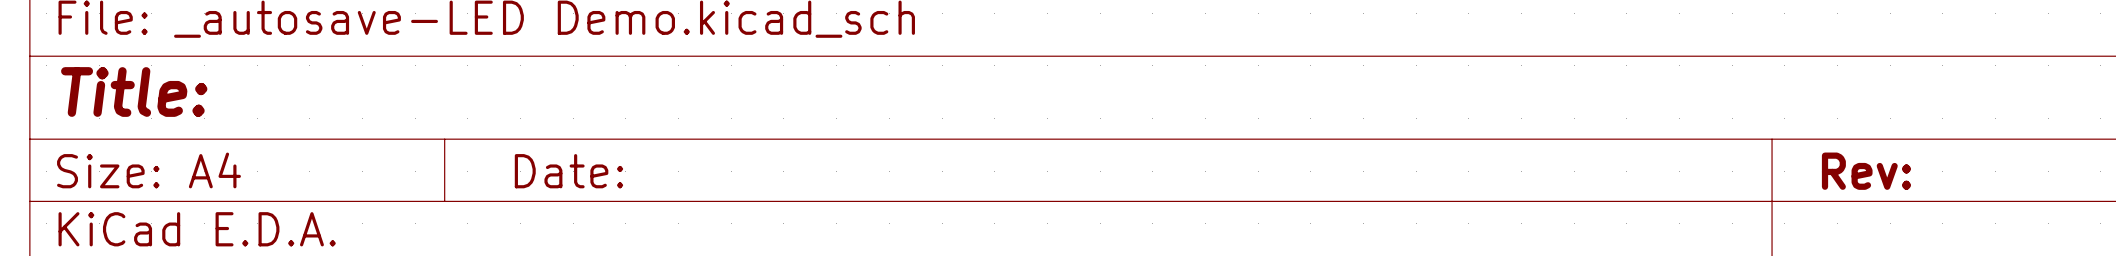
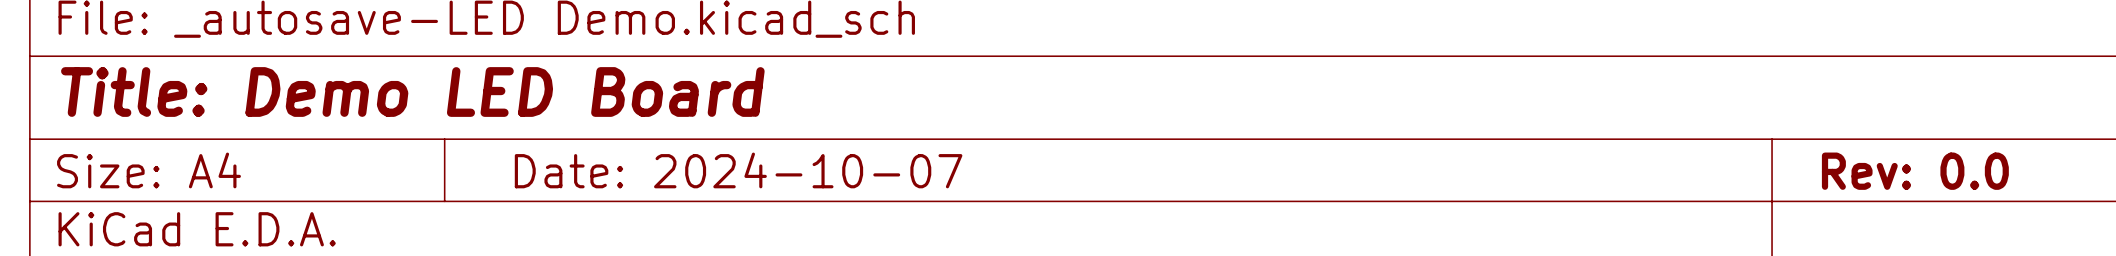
title block: Title: (134, 92) -> Title: Demo LED Board (412, 92)
title block: Date: (568, 171) -> Date: 2024-10-07 (738, 170)
title block: Rev: (1866, 171) -> Rev: 0.0 (1915, 171)

